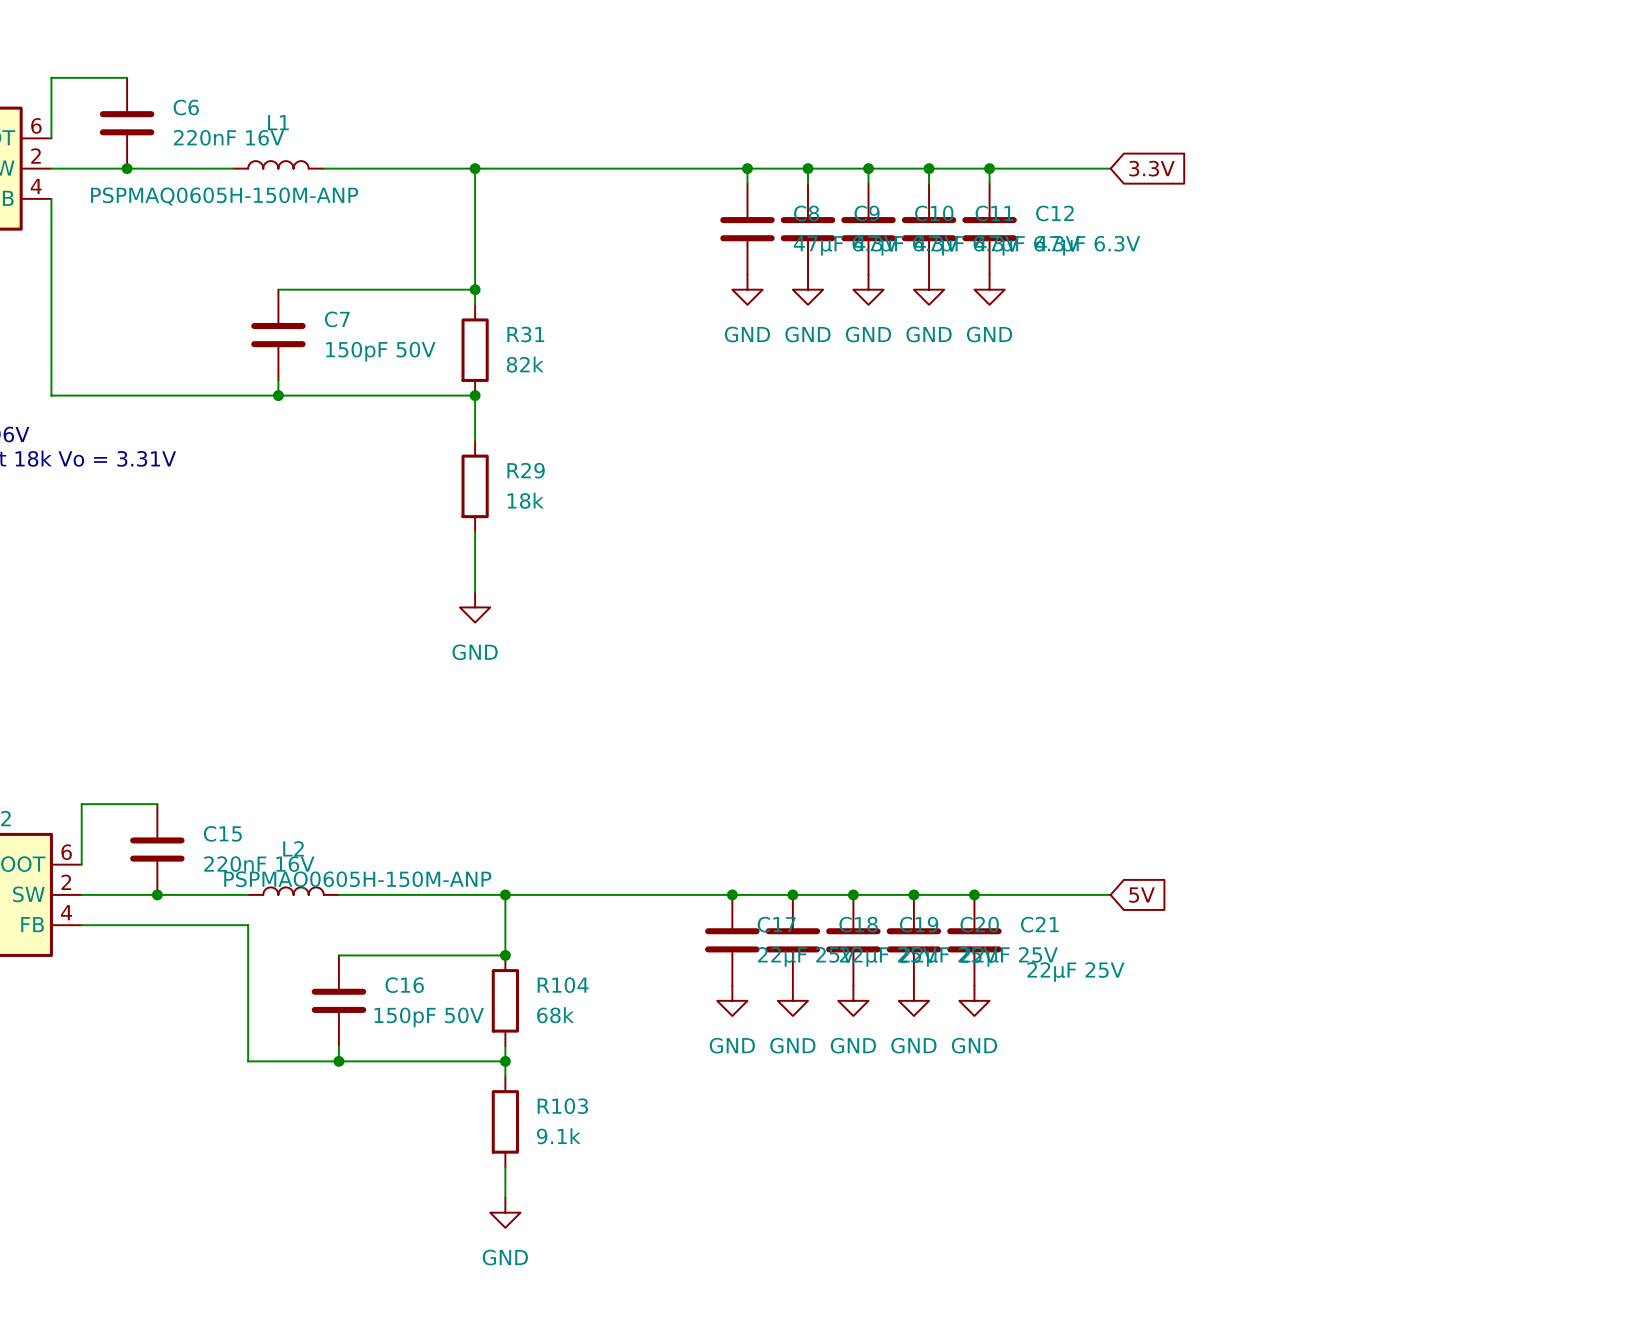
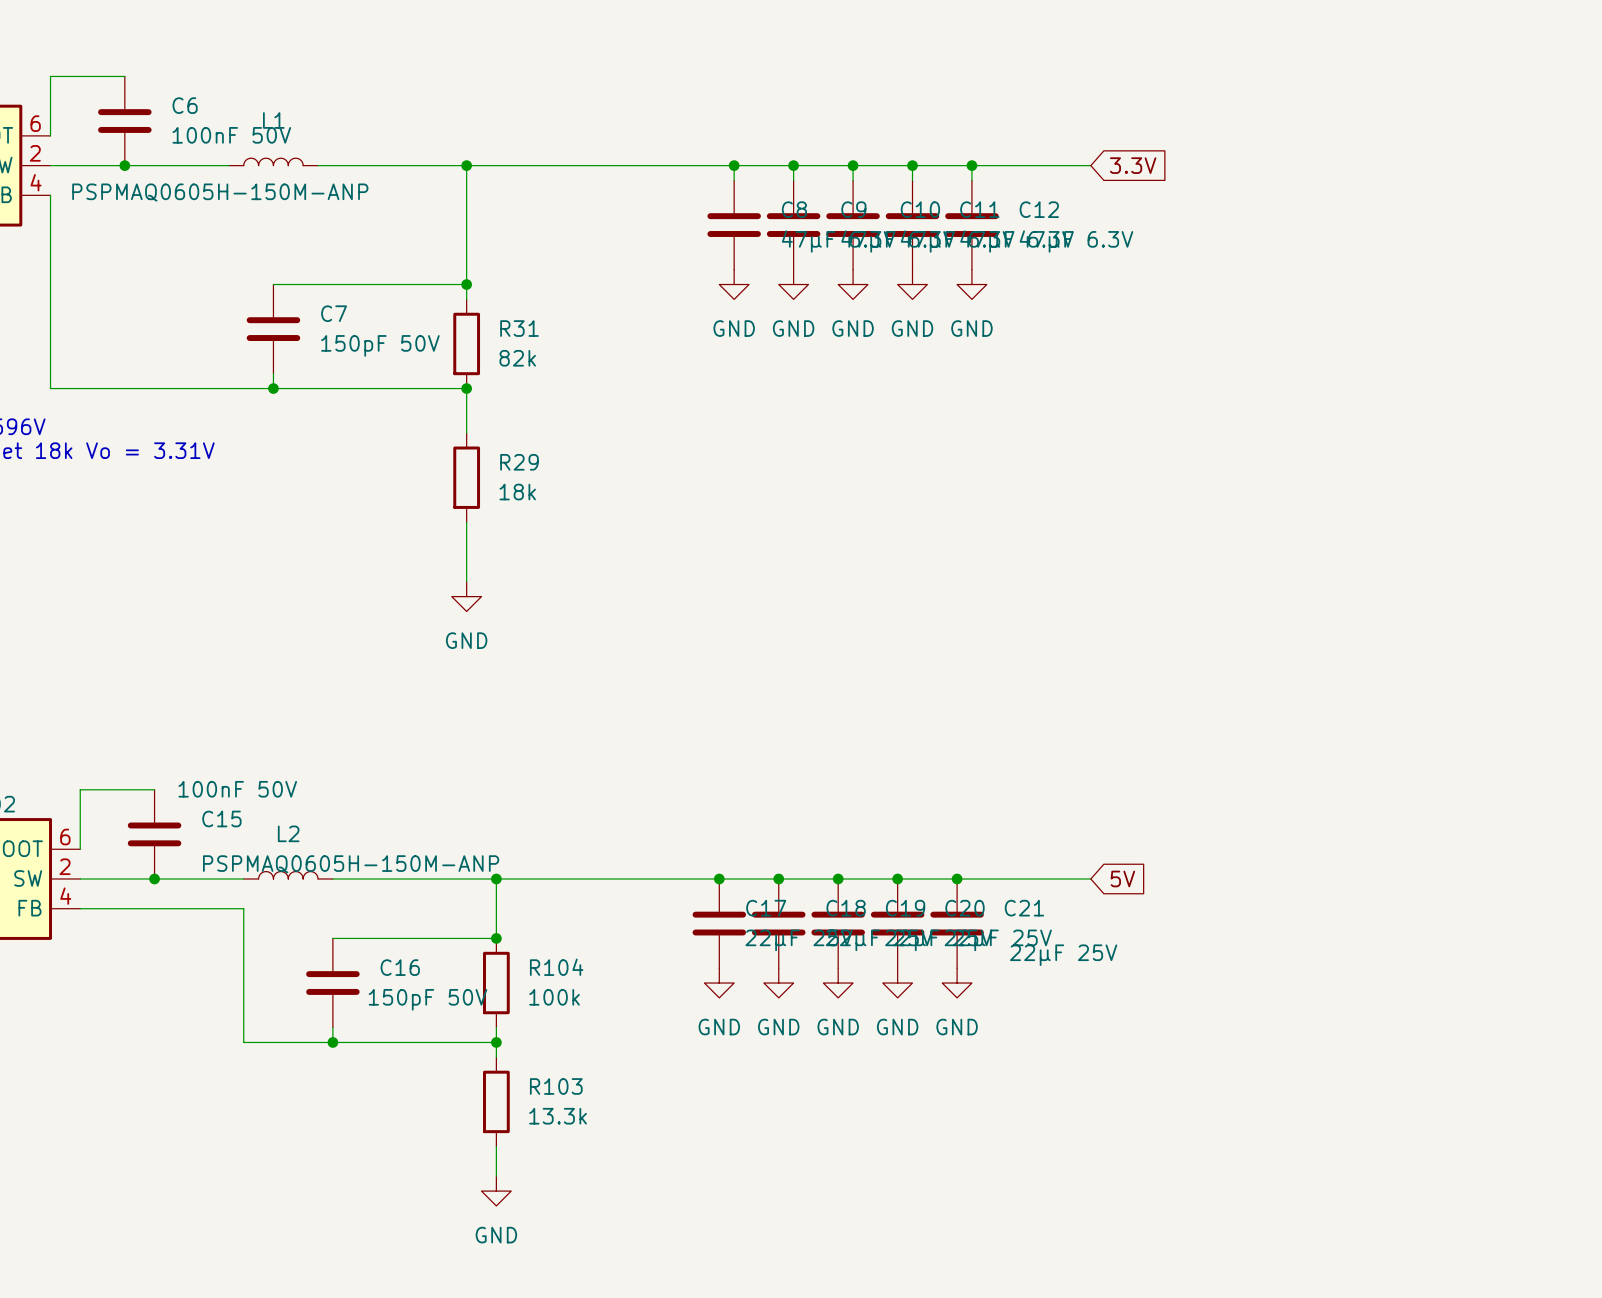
C6 value: 220nF 16V (229, 137) -> 100nF 50V (231, 135)
C15 value: 220nF 16V (259, 864) -> 100nF 50V (237, 789)
R104 value: 68k (555, 1015) -> 100k (554, 997)
R103 value: 9.1k (558, 1136) -> 13.3k (558, 1116)

